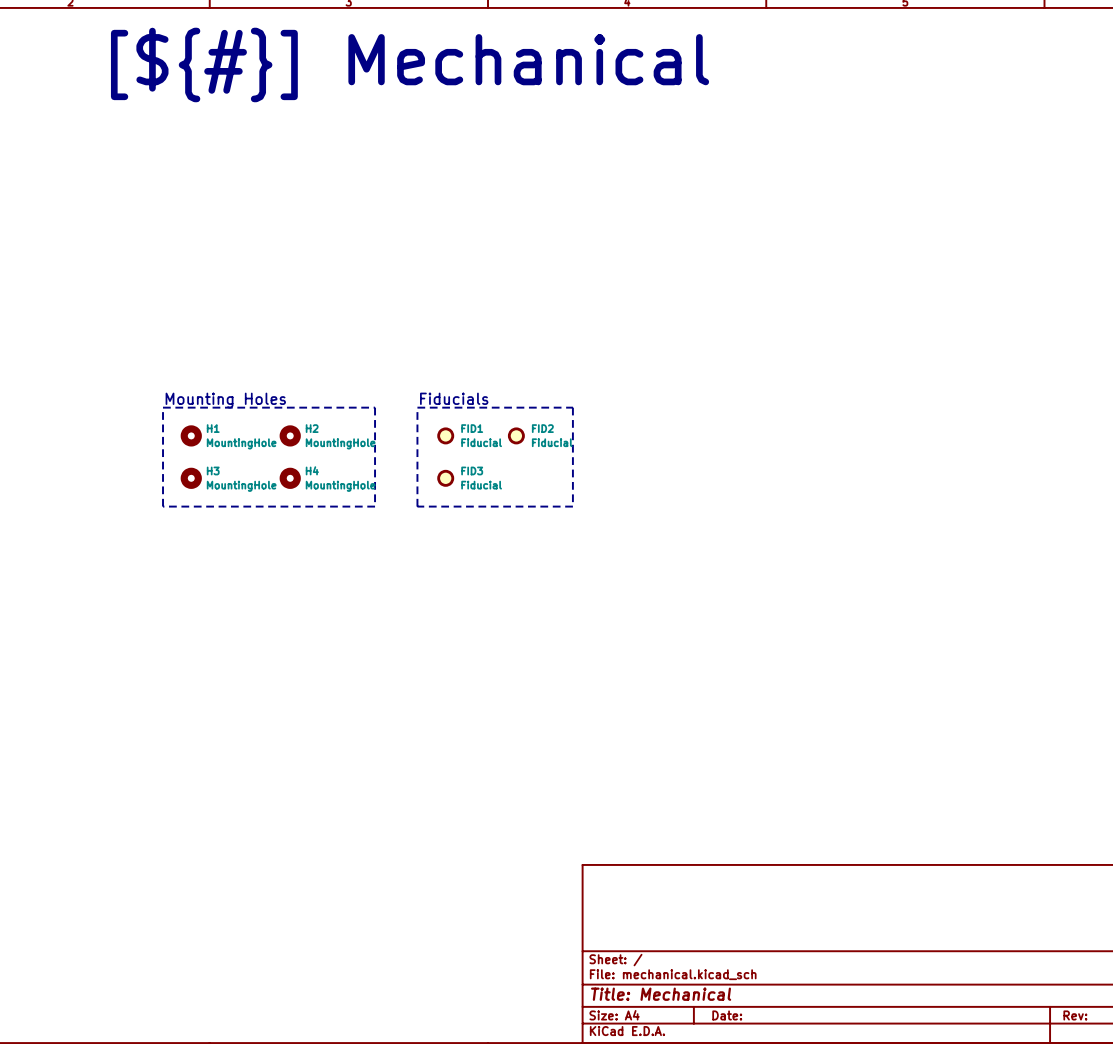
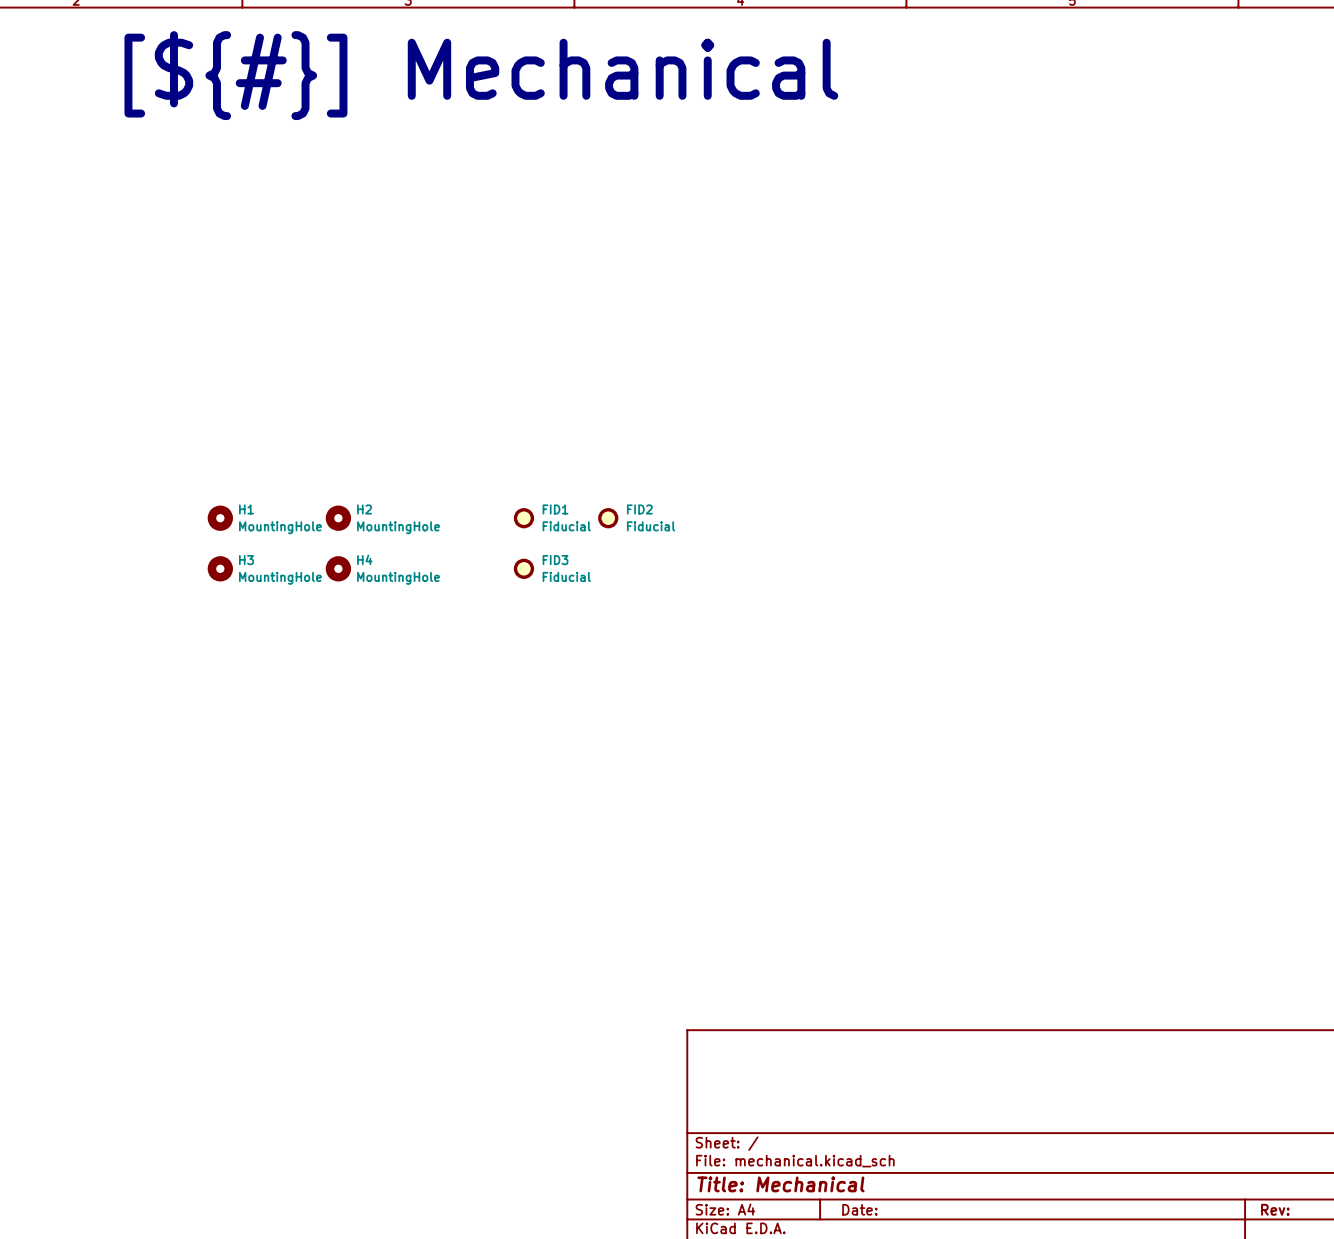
text: Fiducials (454, 398) -> none
text: Mounting Holes (225, 400) -> none
line: (163, 407) (375, 407) (375, 506) (163, 506) (163, 407) -> none
line: (417, 407) (572, 407) (572, 506) (417, 506) (417, 407) -> none

